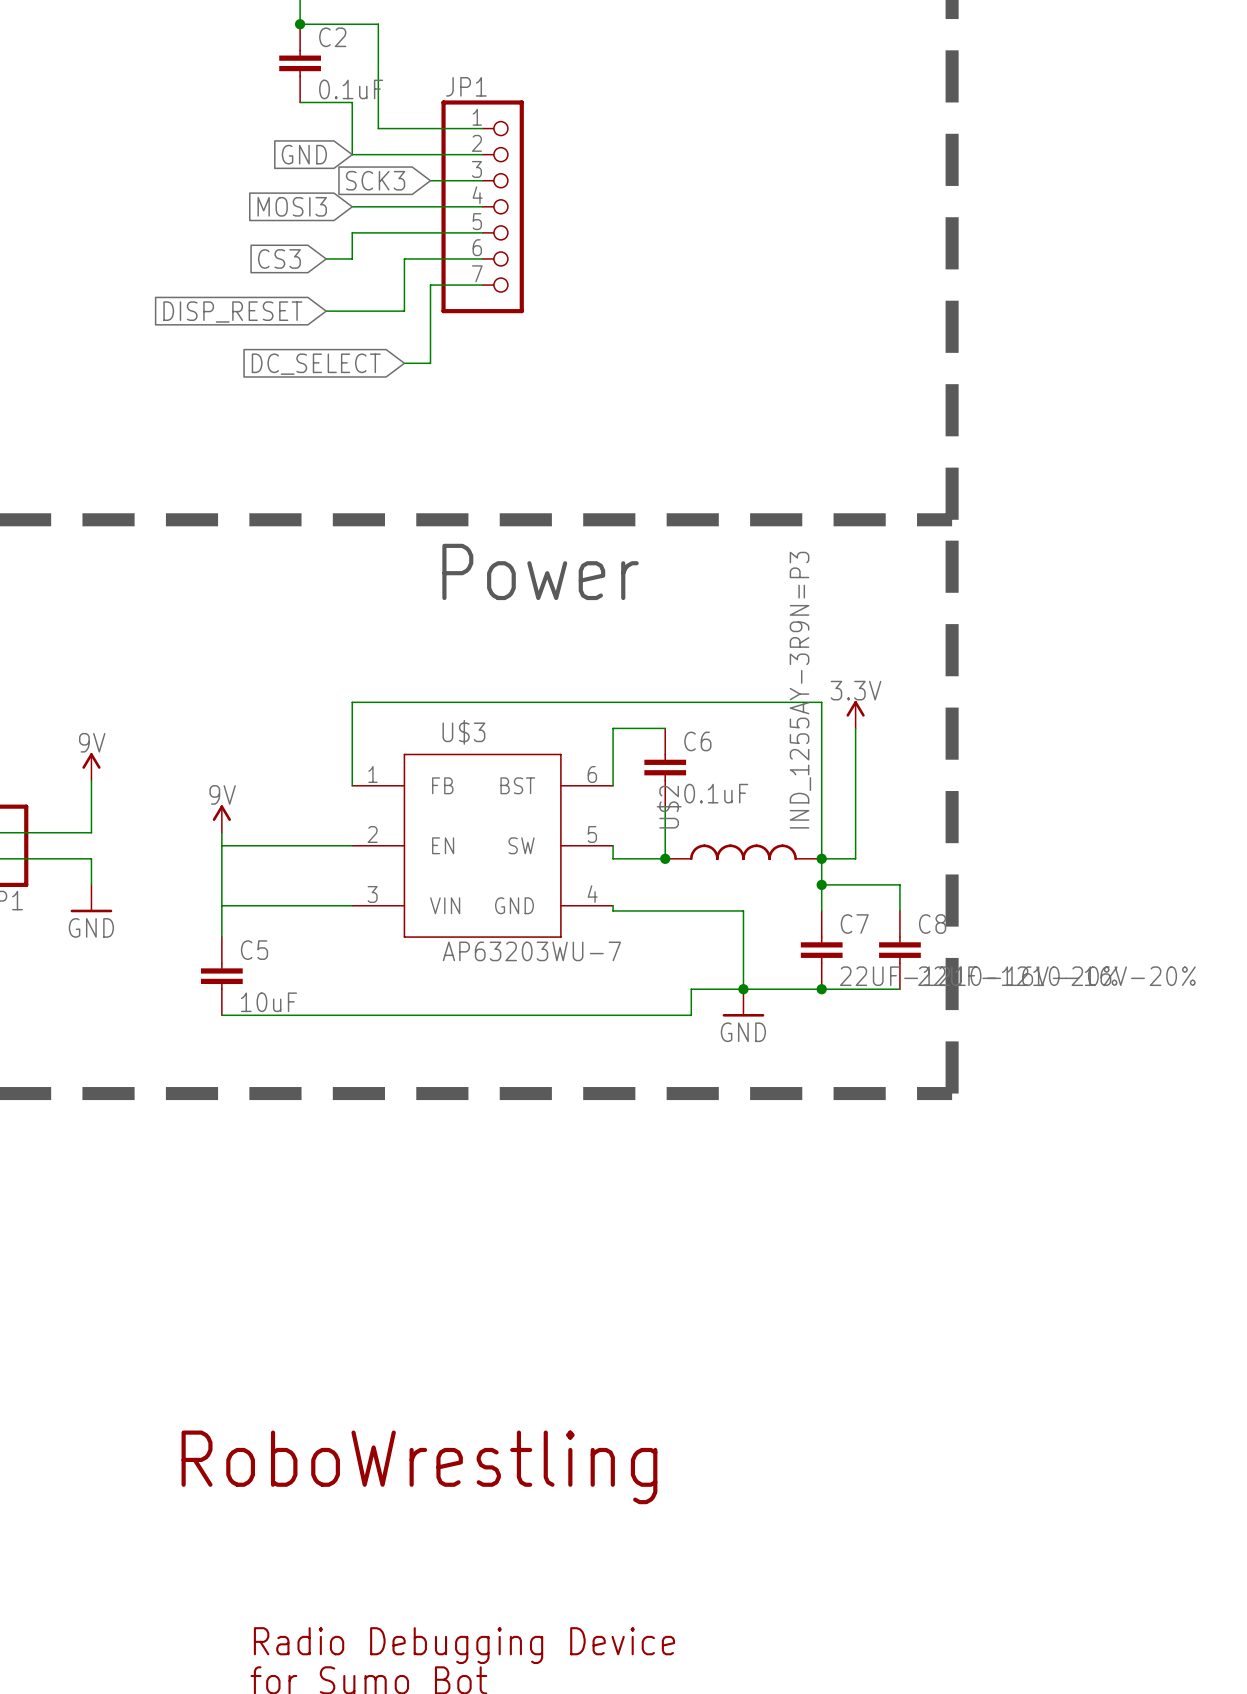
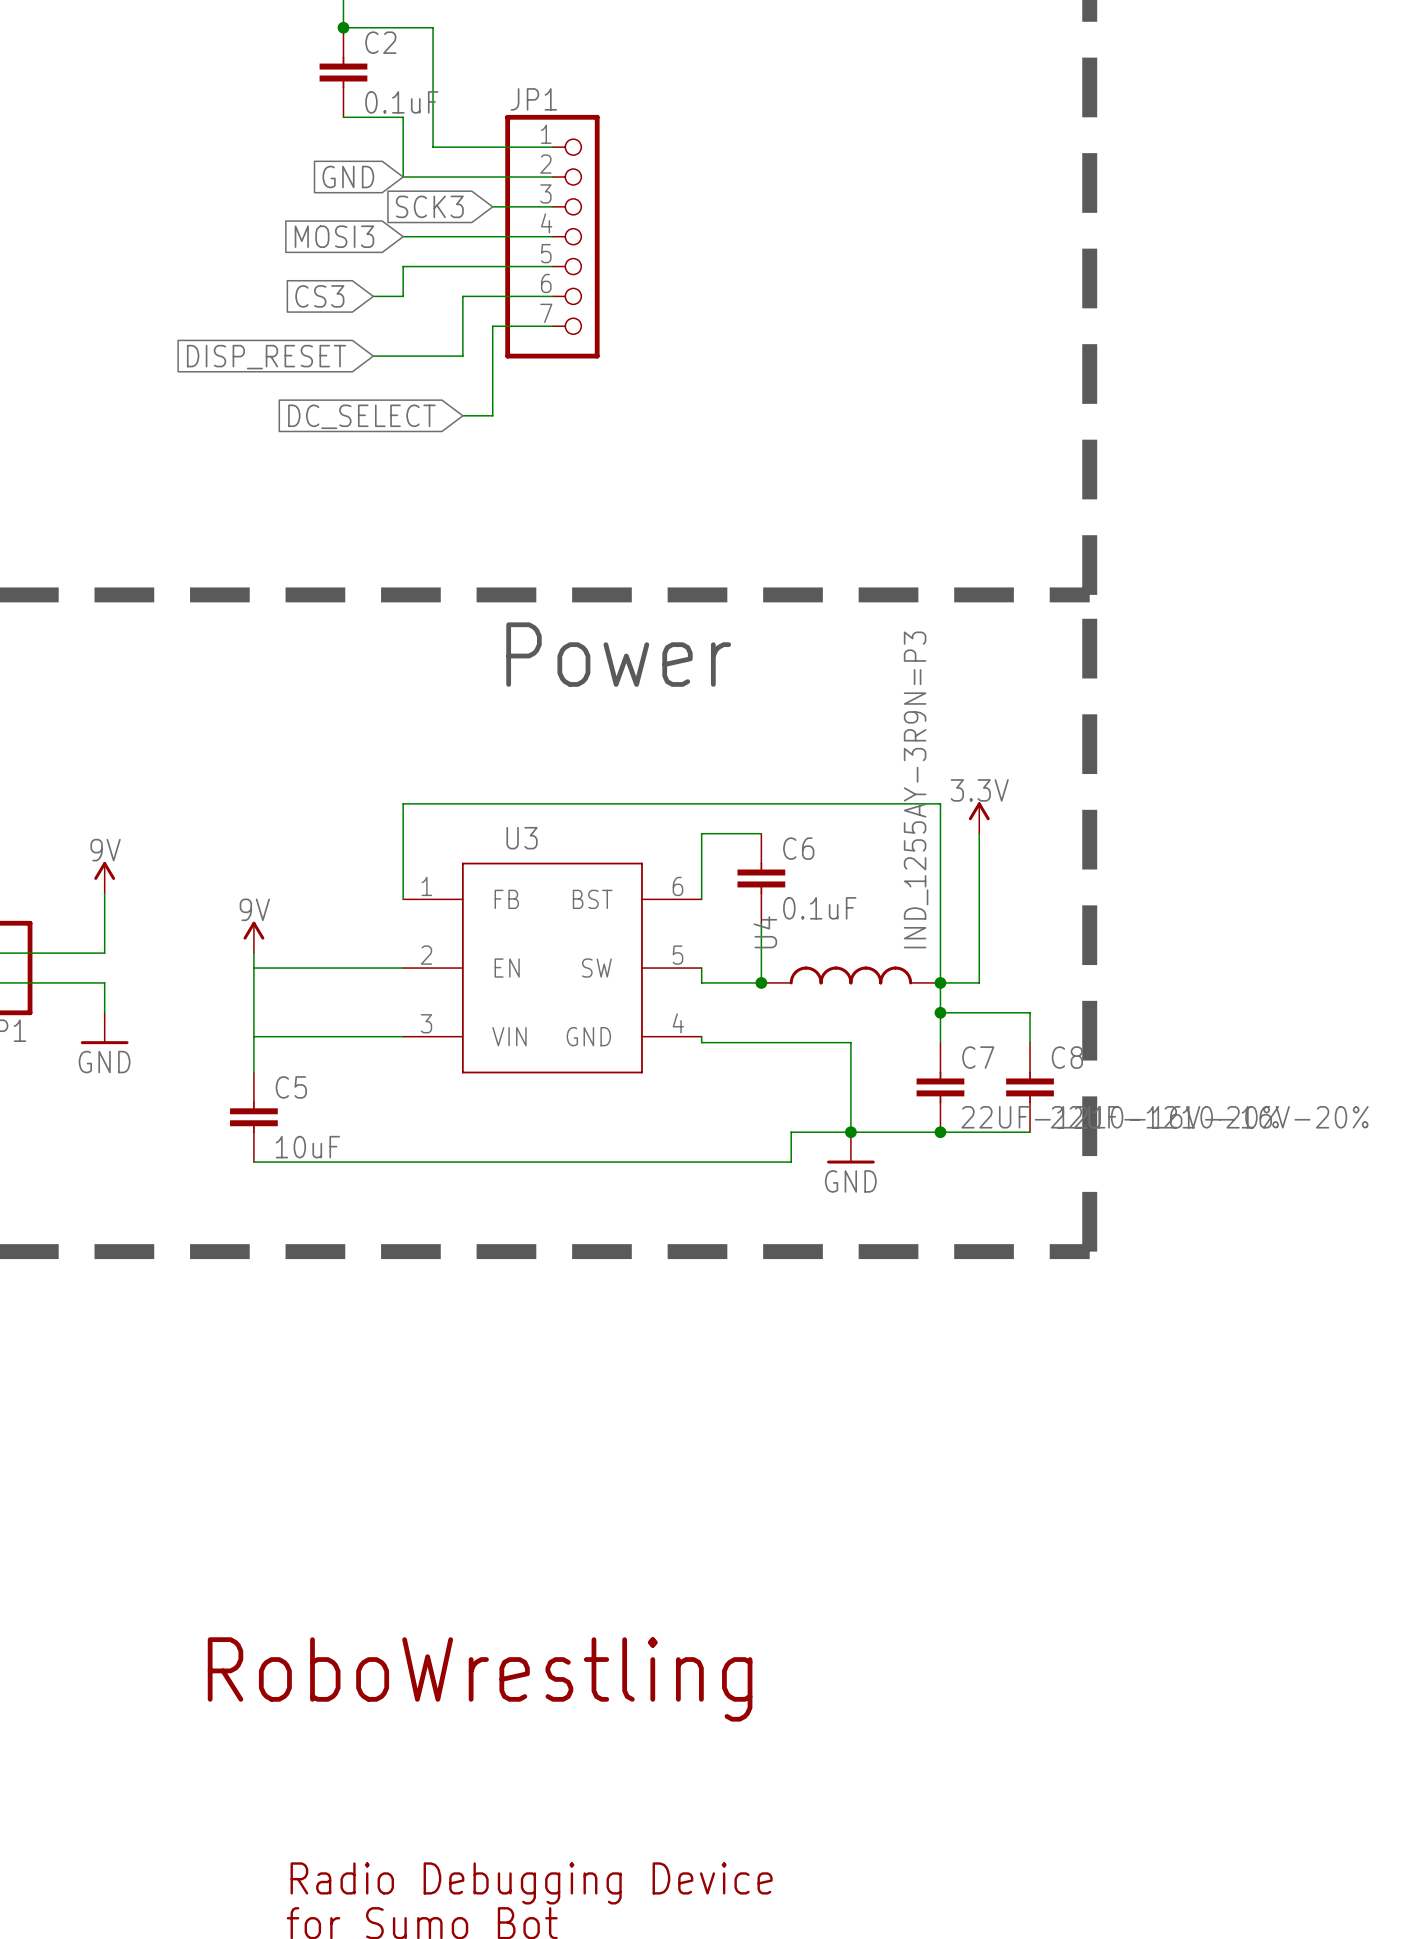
U$3 name: U$3 (463, 732) -> U3 (522, 838)
U$2 name: U$2 (669, 807) -> U4 (765, 932)
U$3 value: AP63203WU-7 (531, 951) -> none

